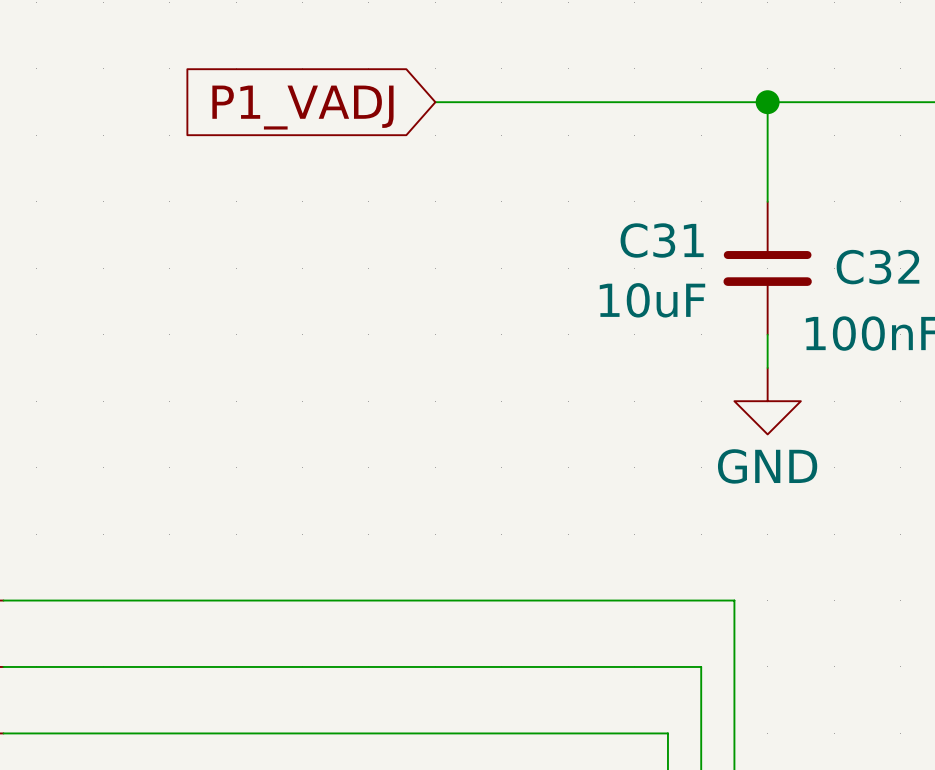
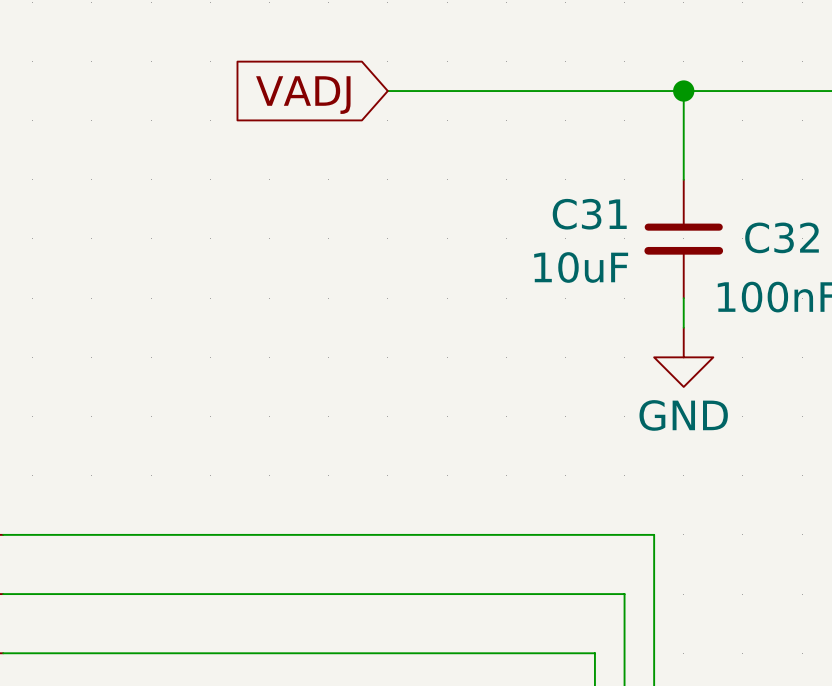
global label: P1_VADJ (302, 107) -> VADJ (303, 95)

